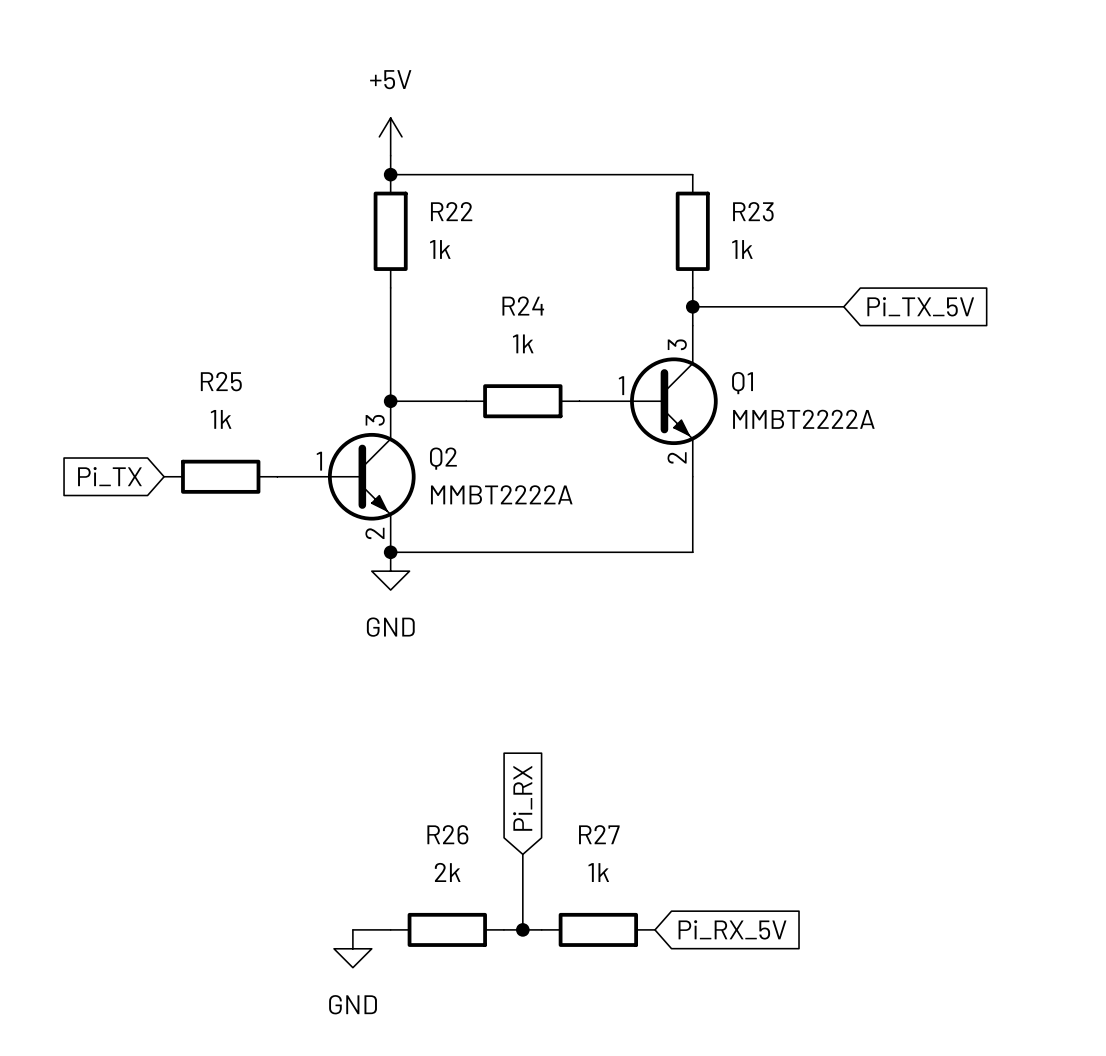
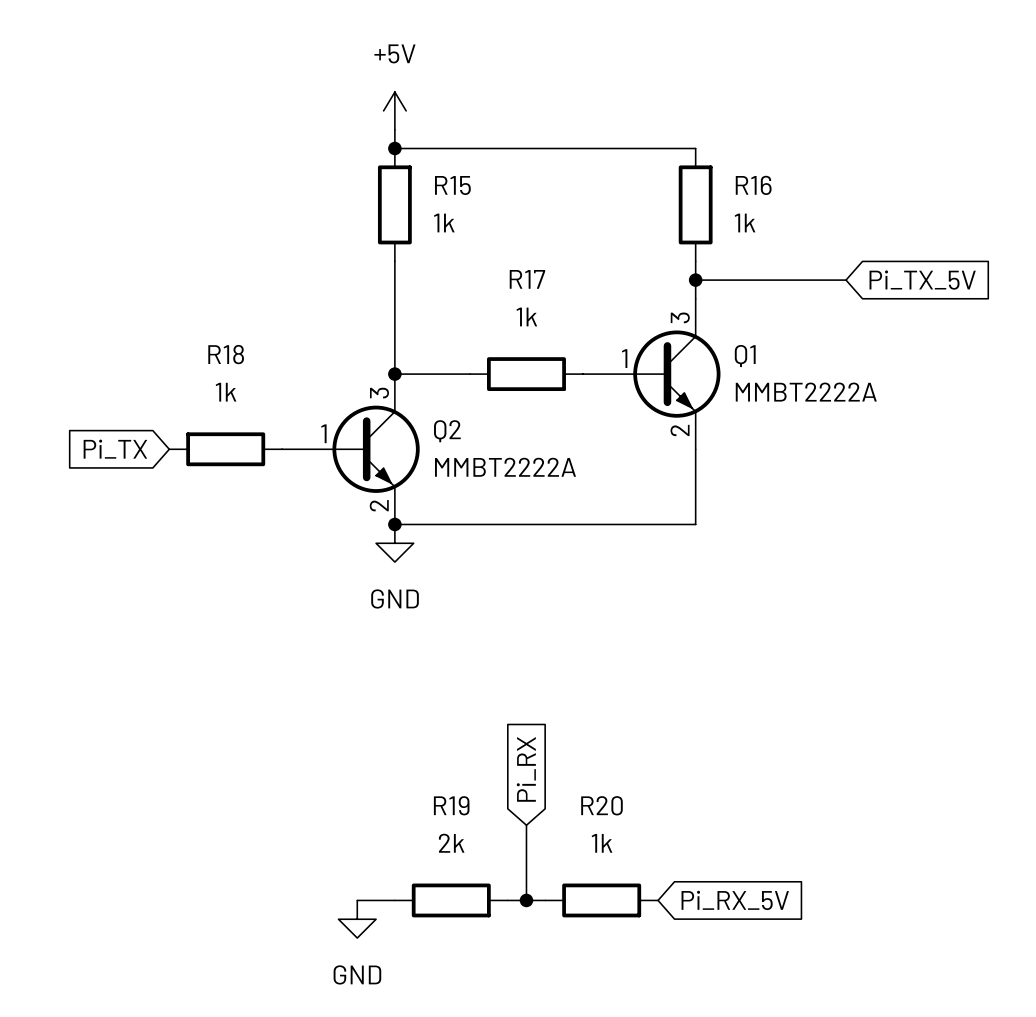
R22 name: R22 (451, 211) -> R15 (452, 185)
R23 name: R23 (753, 211) -> R16 (753, 185)
R24 name: R24 (523, 306) -> R17 (527, 279)
R25 name: R25 (221, 381) -> R18 (226, 354)
R26 name: R26 (447, 834) -> R19 (451, 805)
R27 name: R27 (599, 834) -> R20 (601, 805)

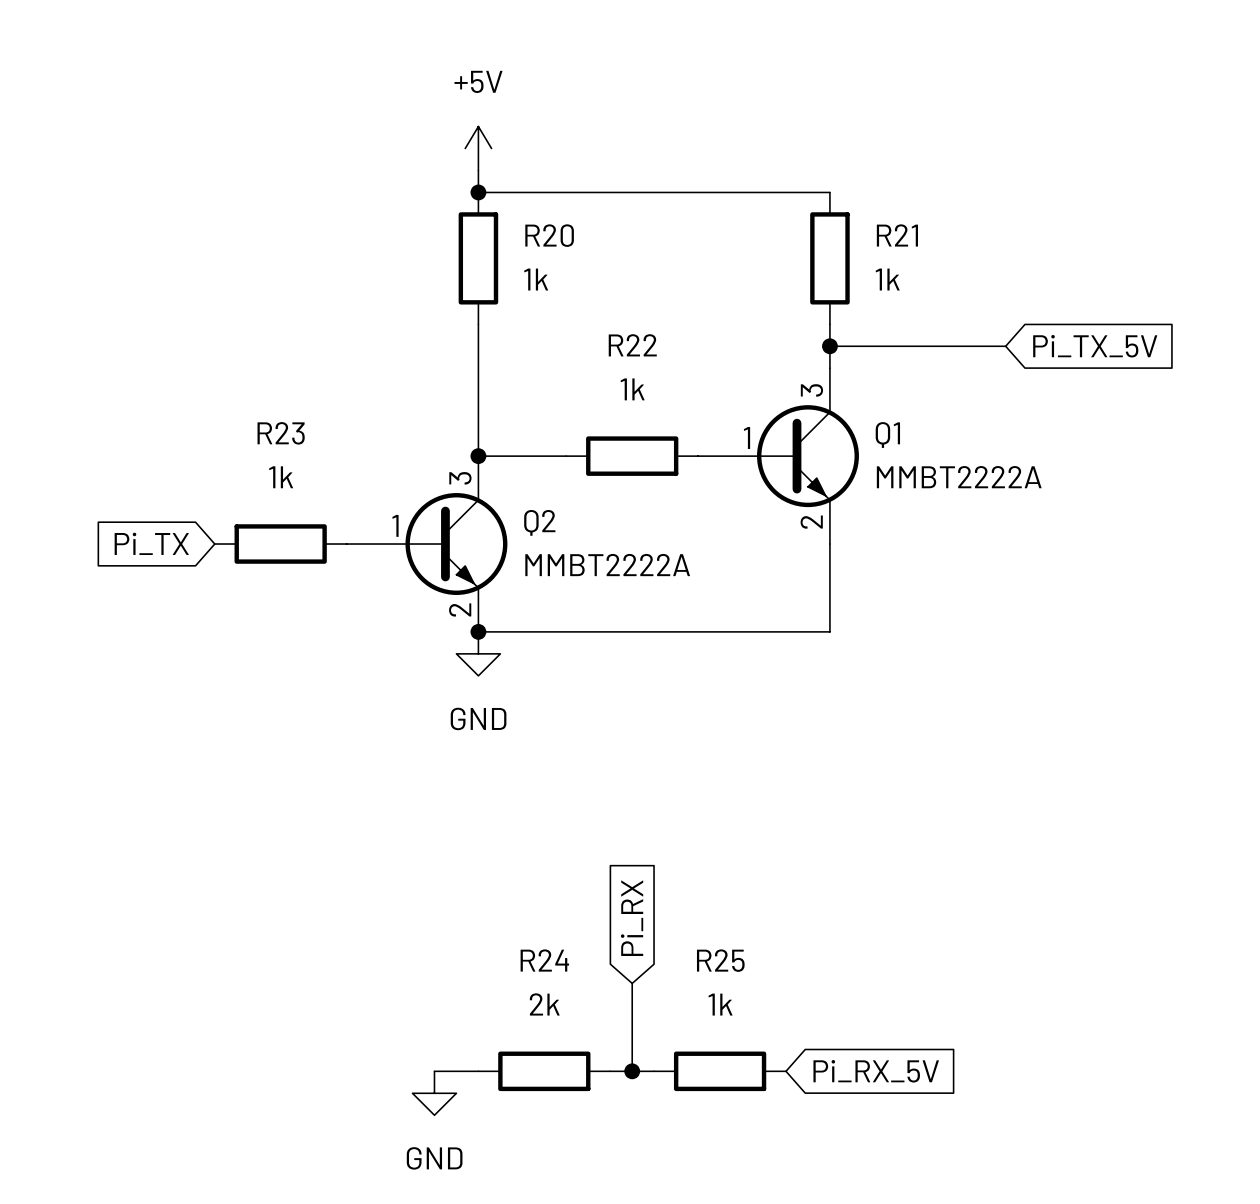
R15 name: R15 (452, 185) -> R20 (549, 235)
R16 name: R16 (753, 185) -> R21 (897, 235)
R17 name: R17 (527, 279) -> R22 (632, 345)
R18 name: R18 (226, 354) -> R23 (281, 433)
R19 name: R19 (451, 805) -> R24 (544, 960)
R20 name: R20 (601, 805) -> R25 (720, 960)

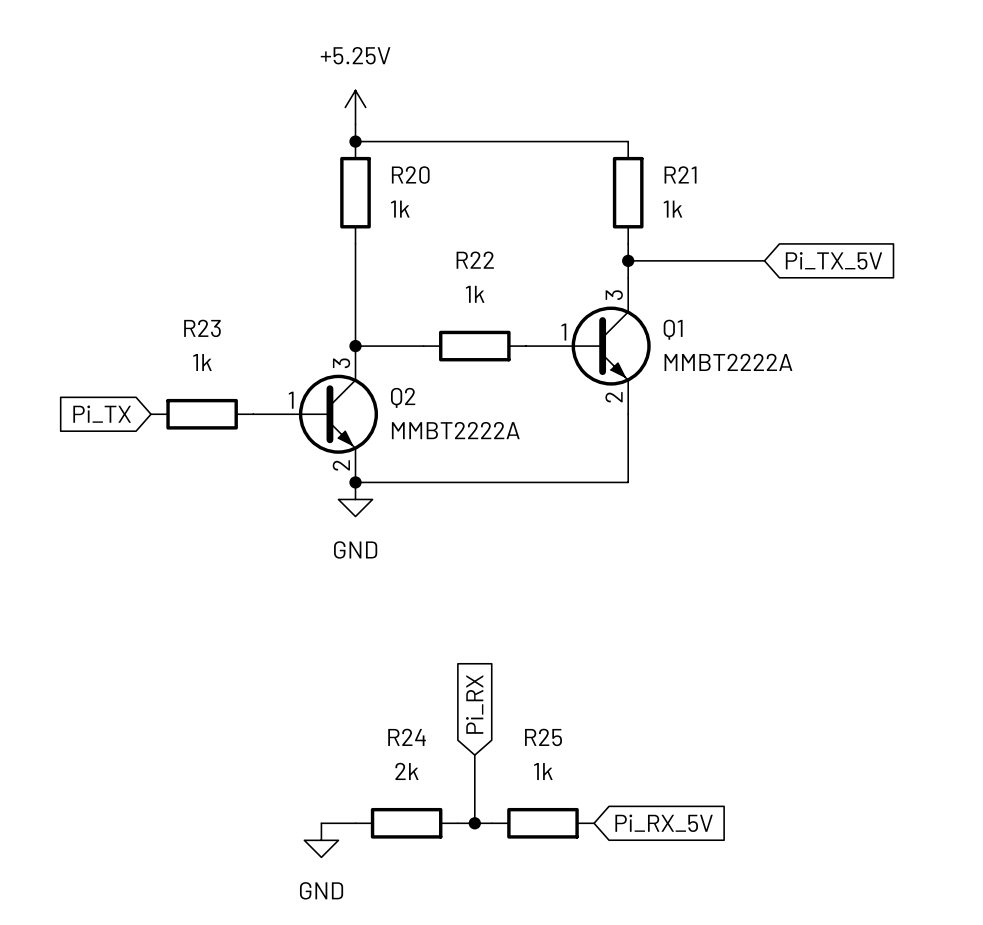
power symbol: +5V (478, 148) -> +5.25V (355, 107)

